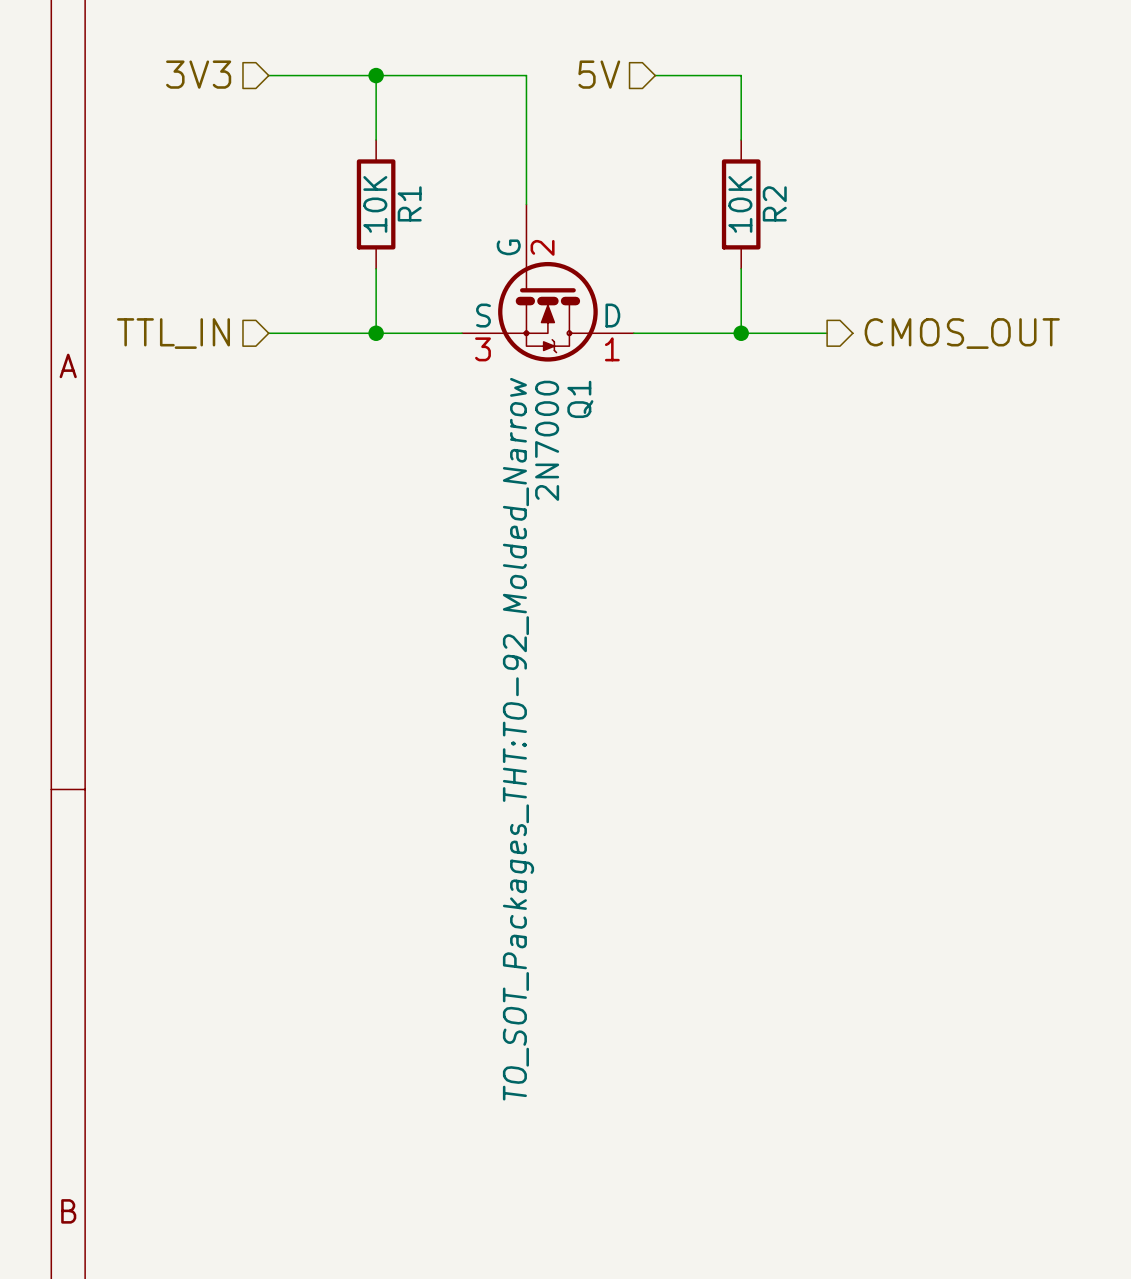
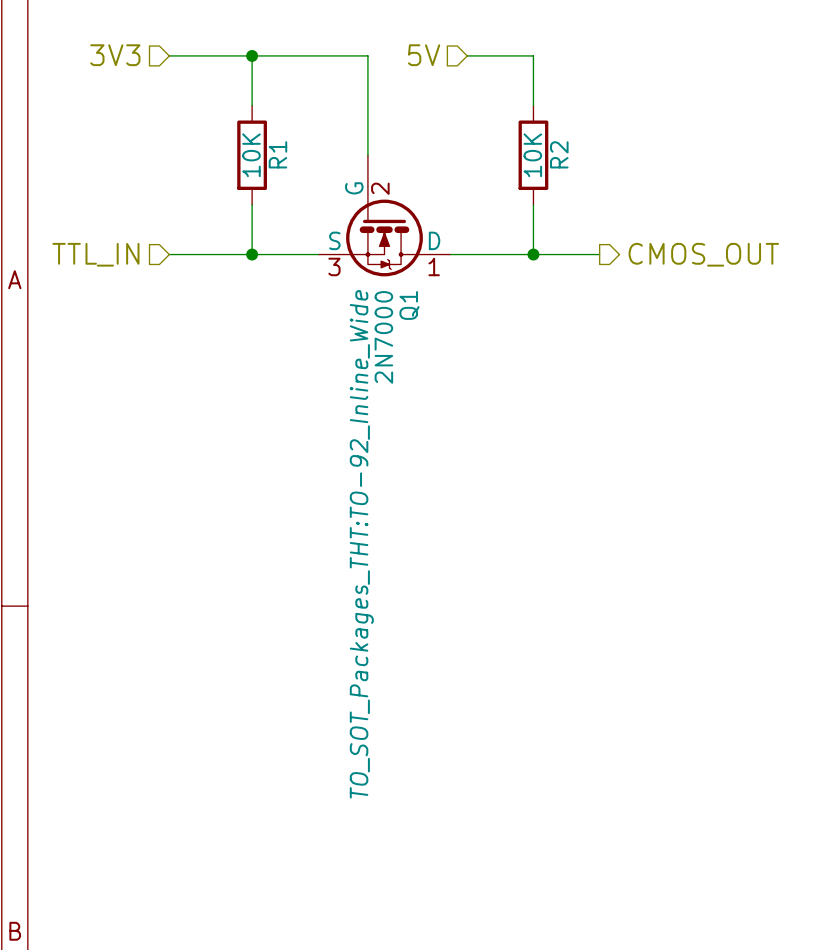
Q1 text: TO_SOT_Packages_THT:TO-92_Molded_Narrow (518, 739) -> TO_SOT_Packages_THT:TO-92_Inline_Wide (361, 544)

